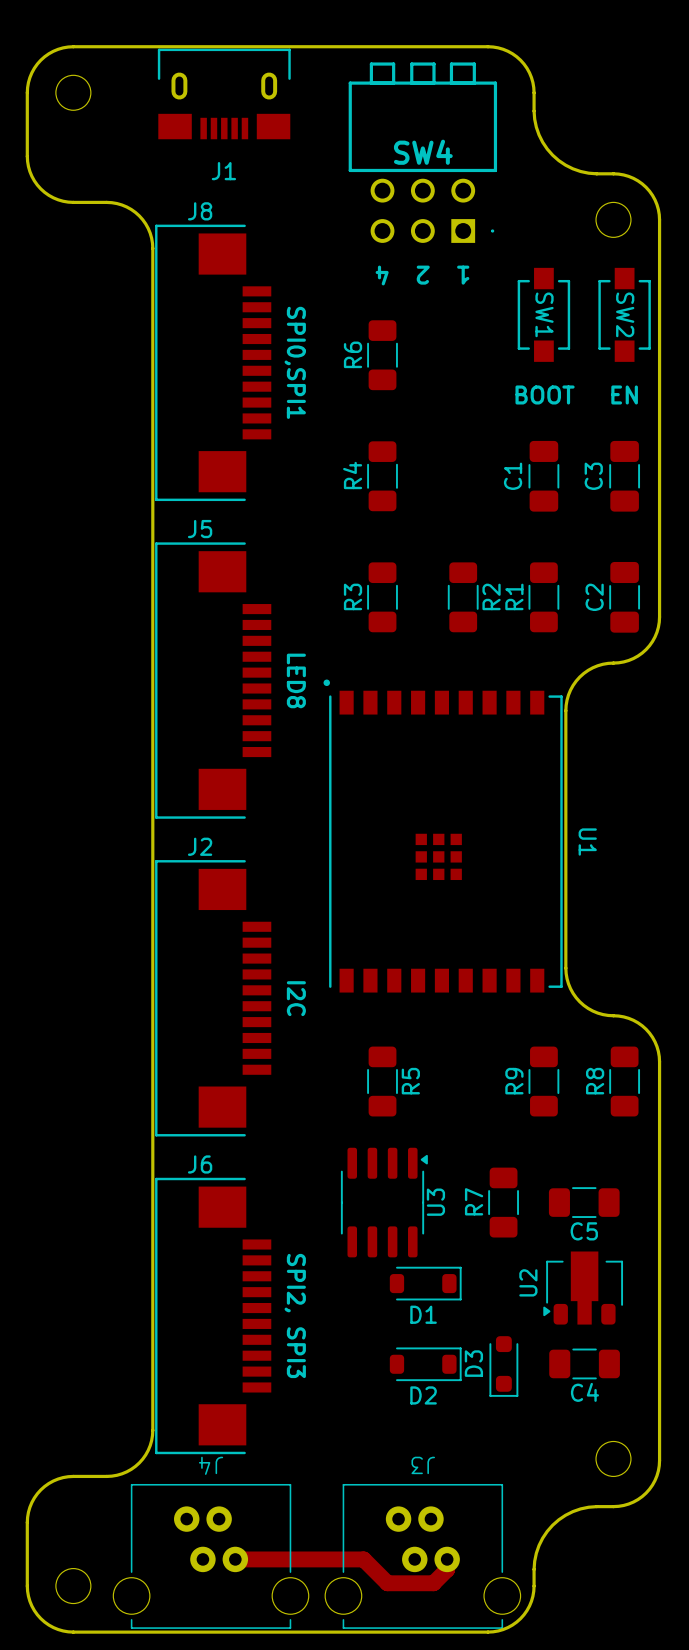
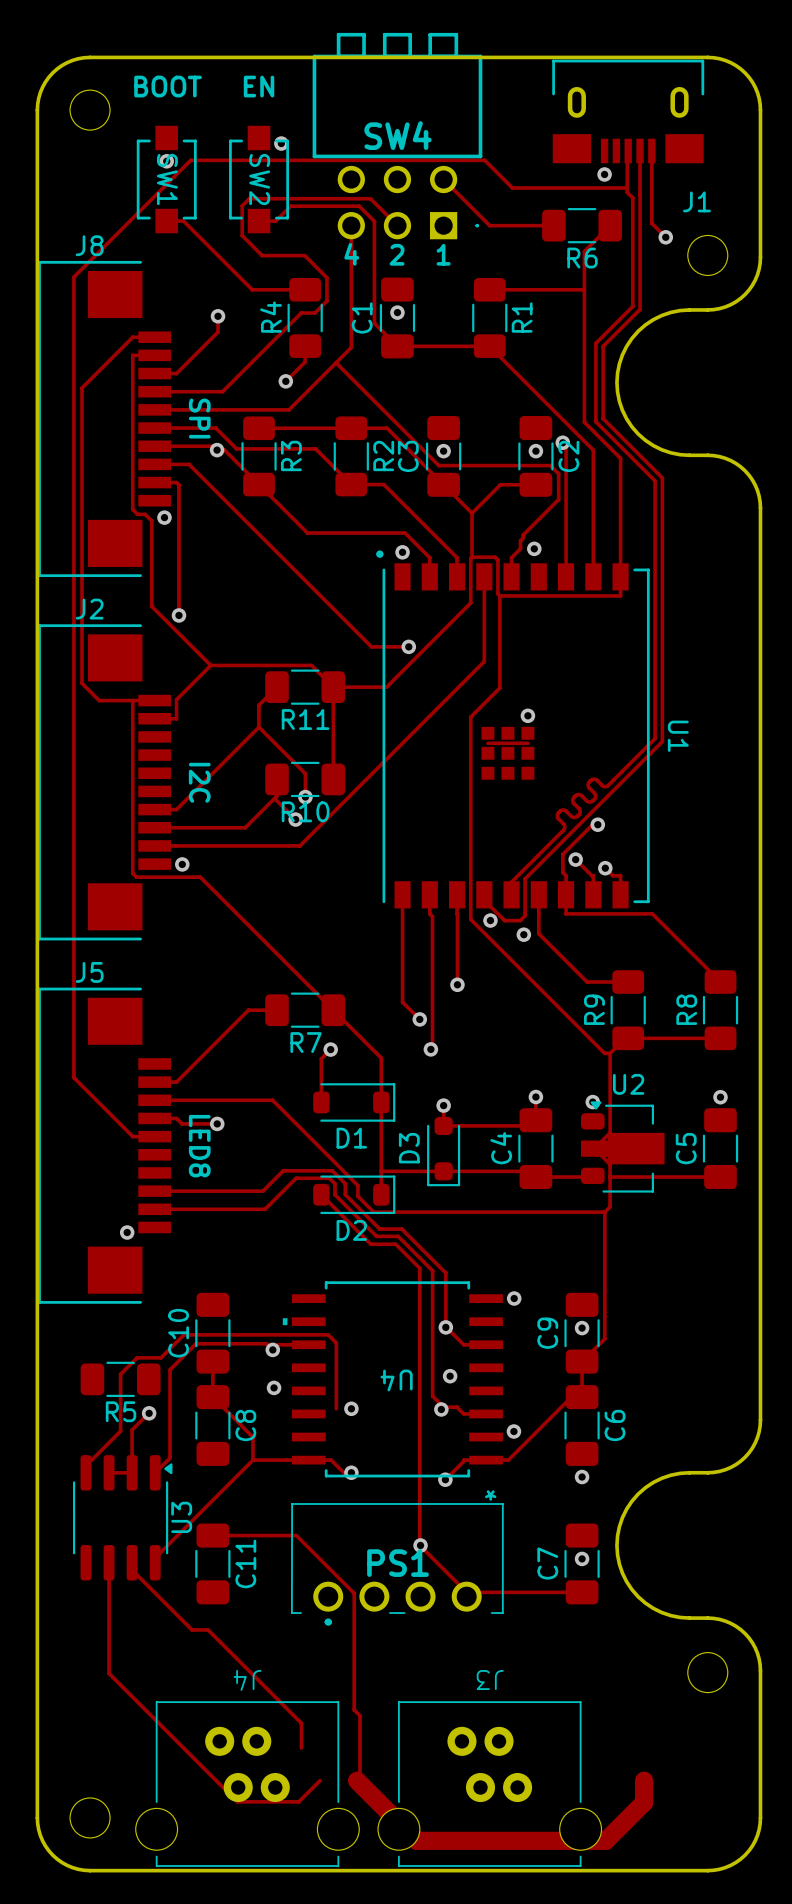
board edge: (488, 46) (507, 51) (520, 60) (527, 68) (533, 87) (536, 127) (542, 142) (552, 155) (565, 165) (580, 171) (618, 174) (638, 180) (652, 195) (656, 204) (659, 219) -> (564, 57) (713, 57) (730, 62) (745, 72) (755, 87) (760, 104) (760, 255)
text: none -> BOOT (168, 86)
text: none -> EN (259, 86)
J1 position: (224, 93) -> (628, 111)
via: none -> (281, 143)
track: none -> (628, 150) (627, 192) (632, 197) (632, 306) (595, 343) (595, 421) (655, 480) (655, 738) (607, 786) (603, 786) (595, 779) (590, 780) (588, 786) (594, 793) (595, 797) (589, 802) (580, 794) (573, 797) (573, 802) (580, 811) (577, 816) (572, 817) (564, 810) (558, 812) (557, 817) (564, 824) (564, 829) (511, 882) (511, 894)
track: none -> (640, 150) (640, 309) (603, 346) (603, 418) (662, 477) (662, 741) (525, 878) (525, 915) (520, 920) (504, 920) (484, 900) (484, 894)
track: none -> (651, 150) (651, 223) (665, 237)
via: none -> (166, 161)
via: none -> (604, 174)
SW4 position: (422, 152) -> (397, 136)
track: none -> (443, 179) (489, 225) (553, 225)
board edge: (27, 156) (29, 171) (34, 180) (44, 192) (53, 197) (68, 202) (116, 203) (135, 212) (148, 228) (152, 248) (152, 1435) (145, 1454) (139, 1462) (126, 1471) (111, 1476) (68, 1476) (48, 1483) (40, 1489) (31, 1502) (27, 1522) -> (37, 182) (37, 1745)
track: none -> (627, 188) (512, 188) (484, 160) (190, 160) (73, 277) (73, 1077) (132, 1136) (154, 1136)
J1 name position: J1 (223, 171) -> J1 (696, 201)
track: none -> (166, 221) (183, 221) (252, 289) (305, 289)
track: none -> (259, 221) (275, 221) (290, 206) (359, 206) (374, 221) (374, 323) (397, 346) (489, 346) (593, 450) (593, 576)
track: none -> (351, 225) (351, 347) (288, 409) (154, 409)
track: none -> (397, 225) (370, 198) (249, 198) (242, 205) (242, 235) (262, 255) (304, 255) (326, 277) (326, 301) (314, 313) (301, 313) (222, 391) (154, 391)
track: none -> (610, 225) (584, 251) (584, 422) (620, 458) (620, 595) (499, 595)
via: none -> (665, 237)
board edge: (659, 221) (659, 440) -> (760, 257) (759, 269) (752, 285) (735, 301) (713, 309) (670, 312) (645, 324) (631, 338) (622, 354) (616, 382) (622, 410) (631, 426) (645, 440) (670, 452) (713, 455) (735, 463) (748, 475) (755, 485) (760, 508)
track: none -> (489, 289) (584, 289)
via: none -> (397, 312)
track: none -> (218, 316) (218, 332) (176, 373) (154, 373)
via: none -> (218, 316)
text rotation: 0° (382, 275) -> 180° (351, 254)
text position: 4 (382, 275) -> 4 (351, 254)
text rotation: 0° (423, 275) -> 180° (397, 254)
text position: 2 (423, 275) -> 2 (397, 254)
text rotation: 0° (463, 275) -> 180° (443, 254)
text position: 1 (463, 275) -> 1 (443, 254)
track: none -> (154, 337) (132, 337) (82, 388) (82, 683) (99, 700) (154, 700)
track: none -> (305, 346) (305, 362) (285, 381)
track: none -> (154, 355) (132, 355) (132, 509) (137, 514) (145, 514) (151, 520) (151, 606) (210, 665)
track: none -> (336, 362) (438, 465) (550, 465) (558, 473) (558, 499) (523, 534) (520, 540) (520, 548) (511, 557) (511, 576)
SW1 position: (543, 314) -> (166, 179)
SW2 position: (624, 314) -> (259, 179)
via: none -> (285, 381)
R6 name position: R6 (353, 354) -> R6 (582, 258)
R6 rotation: 0° (382, 355) -> 90° clockwise (582, 225)
R6 position: (382, 355) -> (582, 225)
text: none -> SPI (199, 418)
J8 position: (213, 362) -> (104, 418)
text: SPI0,SPI1 (295, 362) -> none
track: none -> (154, 428) (215, 428) (236, 448) (315, 448) (351, 484) (383, 484) (457, 557) (457, 576)
track: none -> (259, 428) (387, 428) (472, 513)
track: none -> (562, 442) (566, 446) (566, 576)
via: none -> (562, 442)
track: none -> (154, 446) (213, 446) (217, 450) (224, 450) (307, 533) (405, 533) (429, 557) (429, 576)
via: none -> (217, 450)
via: none -> (443, 451)
via: none -> (535, 451)
text: BOOT (545, 394) -> none
text: EN (624, 394) -> none
track: none -> (154, 464) (189, 464) (371, 646) (408, 646)
track: none -> (154, 482) (176, 482) (178, 485) (178, 615)
track: none -> (535, 484) (500, 484) (472, 513)
track: none -> (472, 513) (472, 557)
via: none -> (164, 517)
R4 position: (382, 476) -> (305, 317)
via: none -> (534, 548)
C1 position: (543, 476) -> (397, 317)
C3 position: (624, 476) -> (443, 456)
via: none -> (402, 552)
track: none -> (472, 557) (470, 602) (386, 687) (333, 687)
track: none -> (472, 557) (494, 557) (497, 560) (497, 594) (499, 595)
track: none -> (484, 576) (484, 661) (299, 845) (154, 845)
track: none -> (499, 595) (499, 687) (470, 717) (470, 919) (604, 1053) (610, 1053)
via: none -> (178, 615)
via: none -> (408, 646)
track: none -> (210, 665) (176, 699) (176, 718) (154, 718)
track: none -> (210, 665) (311, 665) (333, 687)
R3 name position: R3 (353, 596) -> R3 (291, 455)
R1 name position: R1 (514, 596) -> R1 (522, 317)
track: none -> (277, 687) (258, 705) (258, 727)
R11: none -> (305, 687)
track: none -> (333, 687) (333, 779)
R3 position: (382, 597) -> (259, 456)
R2 position: (463, 597) -> (351, 456)
R1 position: (543, 597) -> (489, 317)
C2 name position: C2 (594, 597) -> C2 (568, 456)
C2 position: (624, 597) -> (535, 456)
track: none -> (132, 700) (132, 873) (136, 877) (200, 877) (381, 1058) (381, 1194)
board edge: (659, 617) (655, 637) (642, 653) (623, 661) (597, 665) (579, 677) (568, 695) (565, 710) (567, 978) (576, 997) (588, 1008) (602, 1014) (628, 1018) (646, 1029) (655, 1041) (659, 1061) -> (760, 709) (760, 1218)
via: none -> (527, 715)
track: none -> (258, 727) (176, 809) (154, 809)
track: none -> (258, 727) (305, 773) (305, 797)
track: none -> (487, 743) (527, 743)
track: none -> (277, 779) (277, 796) (245, 827) (154, 827)
R10: none -> (305, 779)
J5 position: (213, 680) -> (104, 1145)
text position: LED8 (296, 680) -> LED8 (199, 1146)
via: none -> (305, 797)
track: none -> (274, 798) (295, 819)
via: none -> (295, 819)
track: none -> (597, 824) (592, 824) (562, 854) (562, 872) (566, 875) (566, 913) (652, 913) (720, 982)
via: none -> (597, 824)
track: none -> (575, 859) (593, 875) (593, 894)
via: none -> (575, 859)
via: none -> (182, 864)
track: none -> (605, 868) (612, 875) (620, 875) (620, 894)
via: none -> (605, 868)
track: none -> (402, 894) (402, 1002) (419, 1019)
track: none -> (429, 894) (429, 913) (432, 916) (432, 1047) (430, 1049)
track: none -> (457, 894) (457, 984)
track: none -> (538, 894) (538, 933) (587, 982) (628, 982)
via: none -> (490, 920)
via: none -> (523, 934)
U1 position: (443, 836) -> (512, 729)
via: none -> (457, 984)
track: none -> (277, 1010) (248, 1010) (176, 1082) (154, 1082)
via: none -> (419, 1019)
track: none -> (720, 1038) (625, 1038) (610, 1053)
track: none -> (330, 1049) (321, 1058) (321, 1102)
via: none -> (330, 1049)
via: none -> (430, 1049)
track: none -> (610, 1053) (610, 1132) (594, 1148) (610, 1164) (610, 1206) (604, 1212)
track: none -> (535, 1097) (535, 1120) (530, 1125) (443, 1125) (443, 1105)
via: none -> (535, 1097)
via: none -> (720, 1097)
track: none -> (154, 1100) (272, 1100) (357, 1185) (357, 1196) (373, 1212) (604, 1212)
via: none -> (592, 1102)
via: none -> (443, 1105)
track: none -> (154, 1118) (176, 1118) (181, 1123) (217, 1123)
via: none -> (217, 1123)
J2 position: (213, 998) -> (104, 782)
text position: I2C (296, 998) -> I2C (199, 782)
track: none -> (381, 1171) (530, 1171) (535, 1177) (592, 1175)
track: none -> (610, 1177) (720, 1177)
track: none -> (154, 1191) (262, 1191) (283, 1170) (332, 1170) (345, 1183) (345, 1194) (379, 1229) (401, 1229) (445, 1273) (445, 1327) (463, 1344) (486, 1344)
track: none -> (321, 1194) (370, 1244) (395, 1244) (419, 1268) (419, 1545) (466, 1592)
track: none -> (154, 1209) (265, 1209) (296, 1178) (329, 1178) (335, 1183) (335, 1194) (376, 1236) (398, 1236) (432, 1270) (432, 1396) (443, 1407)
track: none -> (604, 1212) (604, 1338) (582, 1361) (582, 1397) (571, 1397) (508, 1460) (463, 1460) (445, 1479)
via: none -> (127, 1232)
R5 rotation: 0° (382, 1081) -> 90° clockwise (120, 1379)
R5 position: (382, 1081) -> (120, 1379)
R9 position: (543, 1081) -> (628, 1010)
R8 position: (624, 1081) -> (720, 1010)
via: none -> (514, 1298)
via: none -> (445, 1327)
via: none -> (582, 1328)
C10: none -> (212, 1333)
C9: none -> (582, 1333)
track: none -> (308, 1344) (277, 1344) (272, 1349) (266, 1343) (196, 1343) (170, 1369) (170, 1458) (155, 1472)
via: none -> (272, 1349)
track: none -> (212, 1361) (212, 1397) (252, 1437) (252, 1460)
via: none -> (450, 1376)
R7 name position: R7 (474, 1201) -> R7 (306, 1042)
U4: none -> (392, 1379)
U3 position: (384, 1202) -> (122, 1517)
R7 rotation: 0° (503, 1202) -> 90° clockwise (305, 1010)
R7 position: (503, 1202) -> (305, 1010)
C5 rotation: 0° (584, 1202) -> 90° clockwise (720, 1148)
C5 position: (584, 1202) -> (720, 1148)
via: none -> (274, 1387)
track: none -> (443, 1407) (456, 1407) (463, 1413) (486, 1413)
track: none -> (336, 1408) (336, 1343) (328, 1334) (183, 1334) (160, 1357) (137, 1357) (120, 1374) (120, 1431) (85, 1465) (85, 1472)
via: none -> (351, 1408)
via: none -> (441, 1409)
track: none -> (149, 1413) (132, 1429) (132, 1472) (109, 1472)
via: none -> (149, 1413)
board edge: (659, 1238) (659, 1457) -> (760, 1420) (759, 1431) (752, 1448) (735, 1464) (713, 1472) (670, 1475) (645, 1487) (631, 1501) (622, 1517) (616, 1545) (622, 1573) (631, 1589) (645, 1603) (670, 1615) (713, 1618) (735, 1626) (752, 1642) (757, 1653) (760, 1670)
C8: none -> (212, 1425)
C6: none -> (582, 1425)
via: none -> (513, 1431)
track: none -> (252, 1460) (331, 1460) (343, 1472) (351, 1472)
track: none -> (252, 1460) (155, 1557) (155, 1562)
D1 position: (425, 1283) -> (354, 1102)
via: none -> (351, 1472)
via: none -> (582, 1477)
U2 rotation: 0° (583, 1288) -> 90° clockwise (622, 1146)
U2 position: (583, 1288) -> (622, 1146)
via: none -> (445, 1479)
J6: (213, 1315) -> none
text: SPI2, SPI3 (295, 1315) -> none
track: none -> (212, 1535) (296, 1535) (354, 1593) (354, 1709) (359, 1715) (359, 1777) (357, 1780) (417, 1840) (605, 1840) (644, 1802) (644, 1780)
via: none -> (420, 1545)
via: none -> (582, 1558)
track: none -> (109, 1562) (109, 1673) (237, 1801) (298, 1801) (319, 1780)
track: none -> (132, 1562) (132, 1570) (192, 1629) (208, 1629) (301, 1723) (301, 1748)
C11: none -> (212, 1563)
C7: none -> (582, 1563)
C4 rotation: 0° (584, 1363) -> 90° clockwise (535, 1148)
C4 position: (584, 1363) -> (535, 1148)
PS1: none -> (397, 1564)
D2 position: (425, 1364) -> (354, 1194)
D3 position: (503, 1366) -> (443, 1151)
track: none -> (466, 1592) (582, 1592)
board edge: (659, 1460) (655, 1480) (649, 1489) (638, 1499) (618, 1506) (580, 1508) (565, 1515) (552, 1525) (542, 1538) (536, 1553) (533, 1591) (527, 1610) (520, 1618) (507, 1627) (488, 1632) -> (760, 1674) (760, 1823) (755, 1840) (745, 1855) (730, 1865) (713, 1870) (564, 1870)
track: (235, 1559) (363, 1559) (387, 1583) (433, 1583) (447, 1569) (447, 1559) -> none

